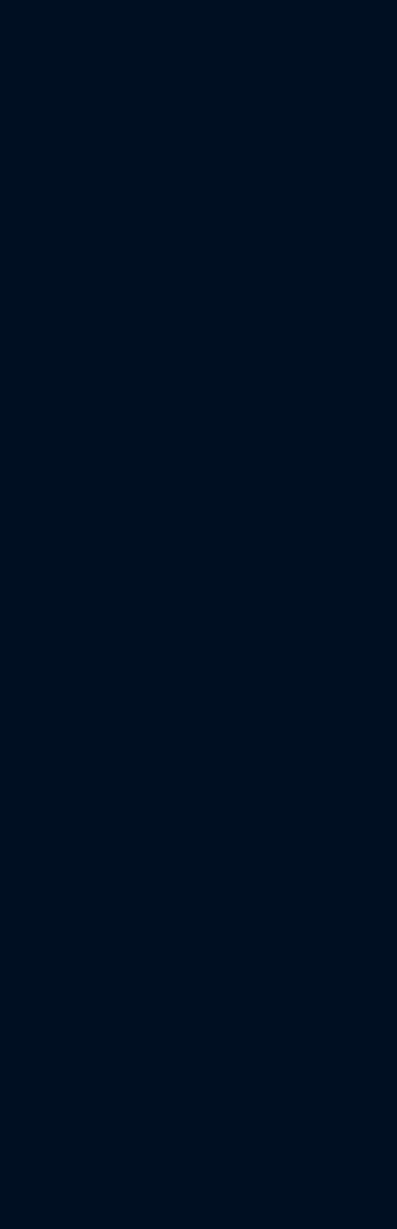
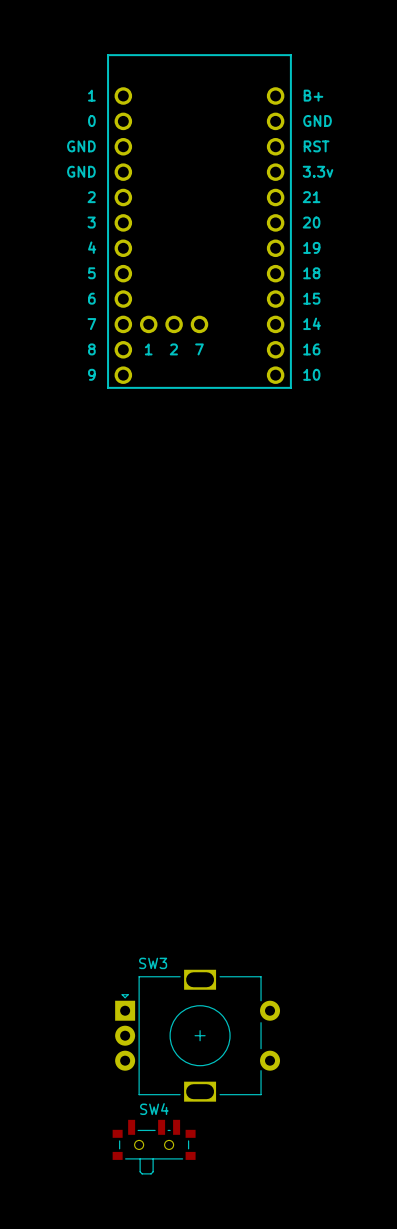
part: none -> (199, 221)
SW3: none -> (197, 1035)
SW4: none -> (154, 1147)

